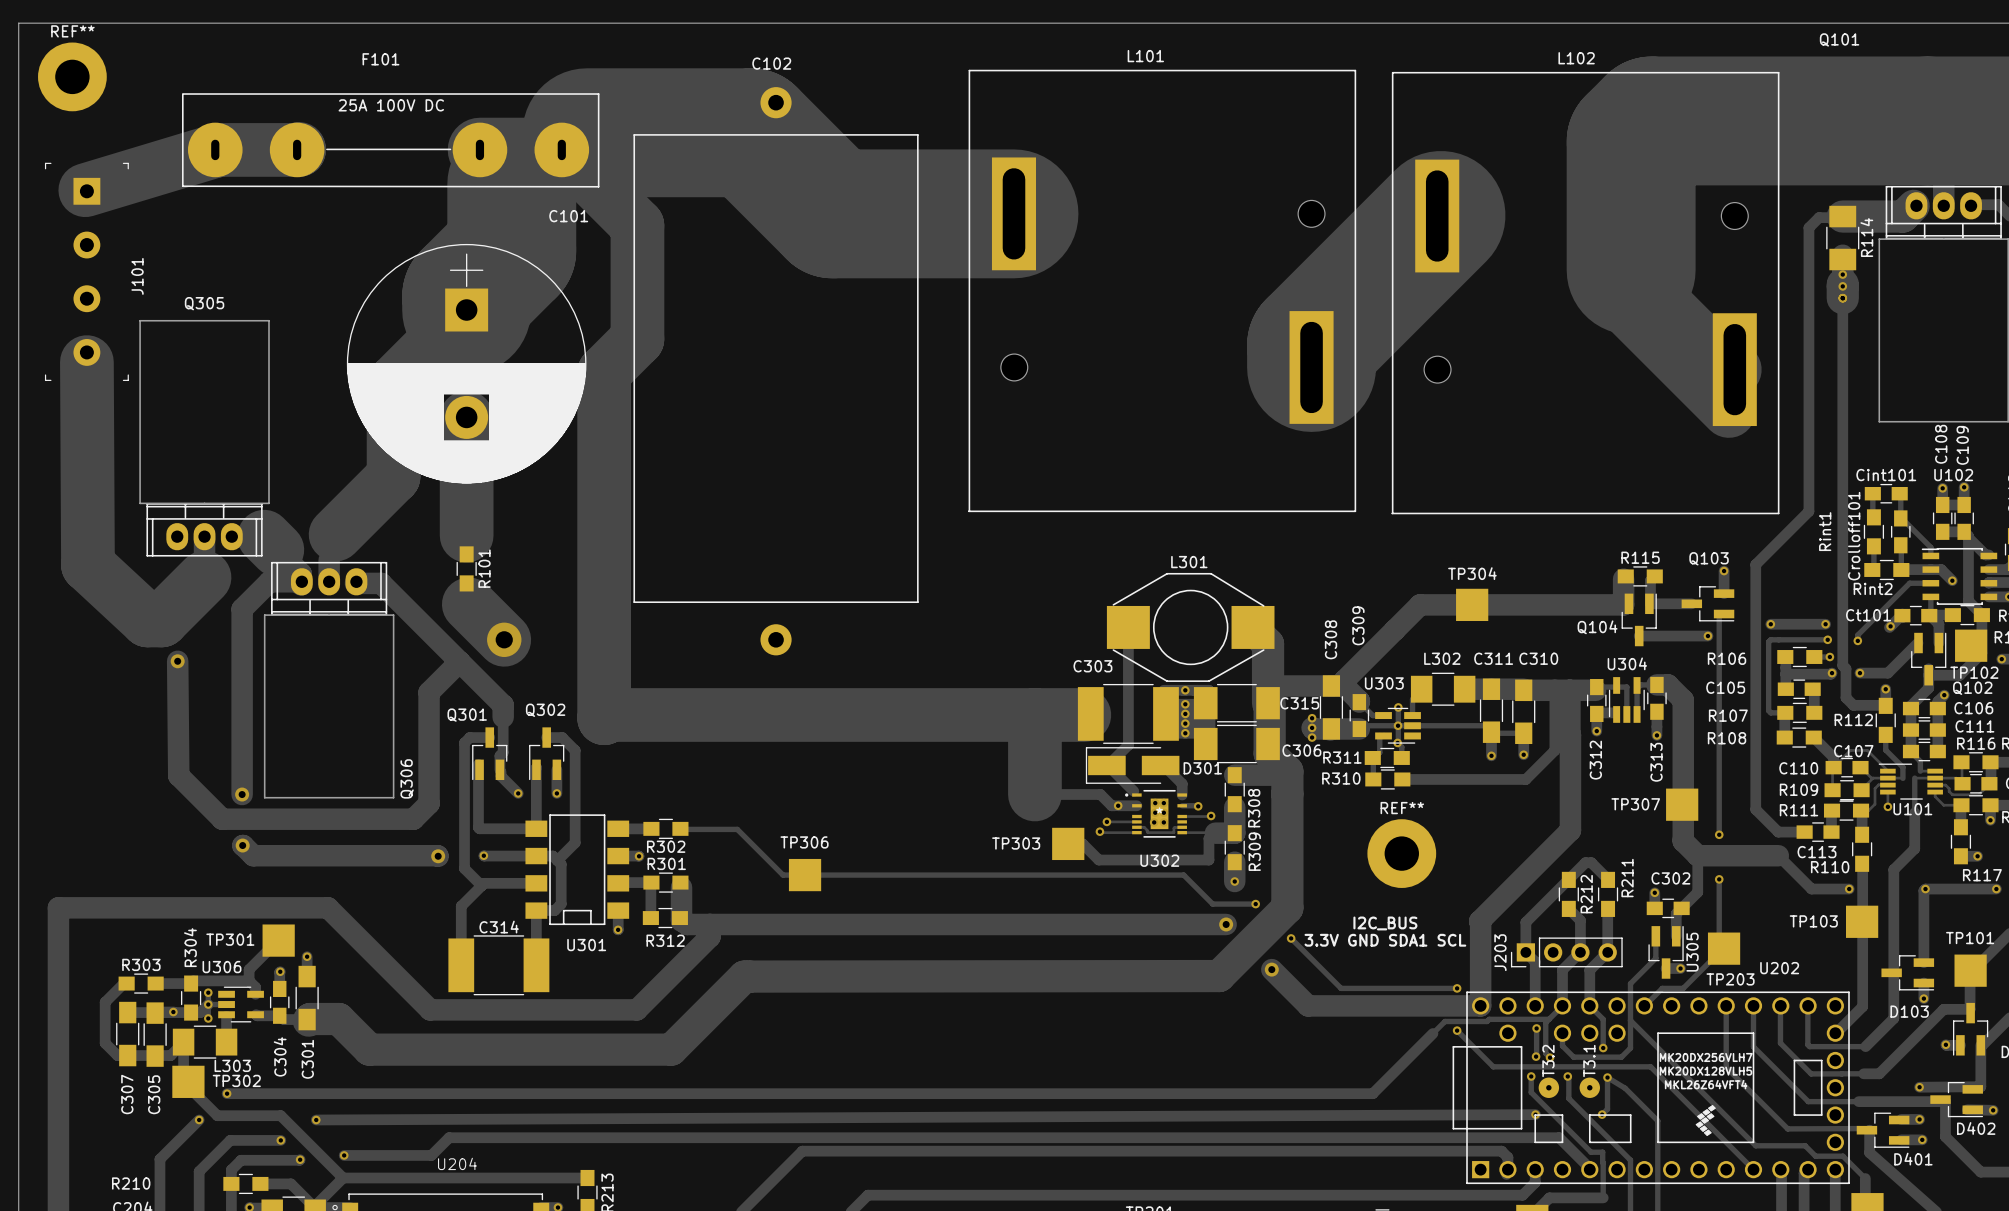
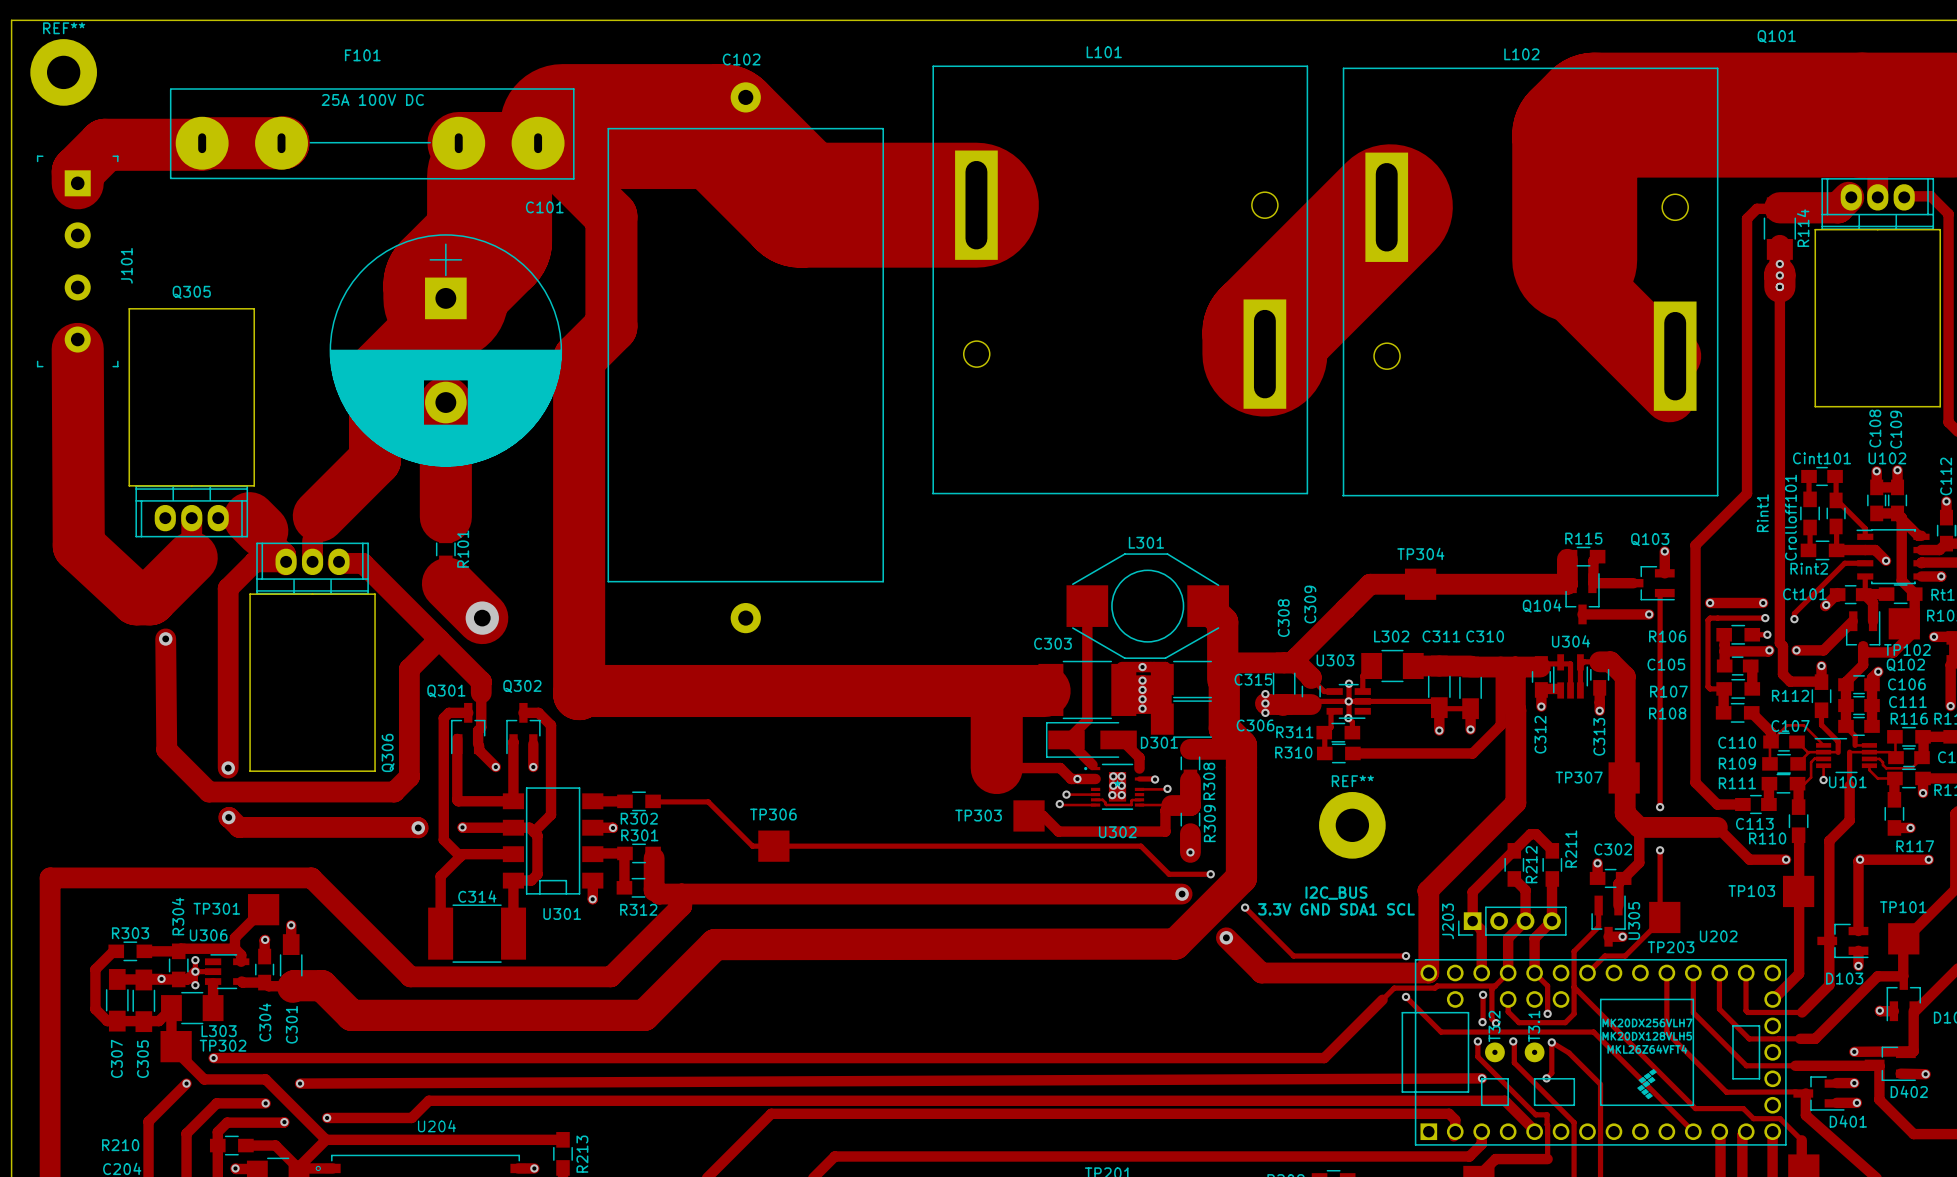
track: (215, 151) (85, 190) -> none
track: none -> (203, 144) (104, 144) (77, 171) (77, 183)

